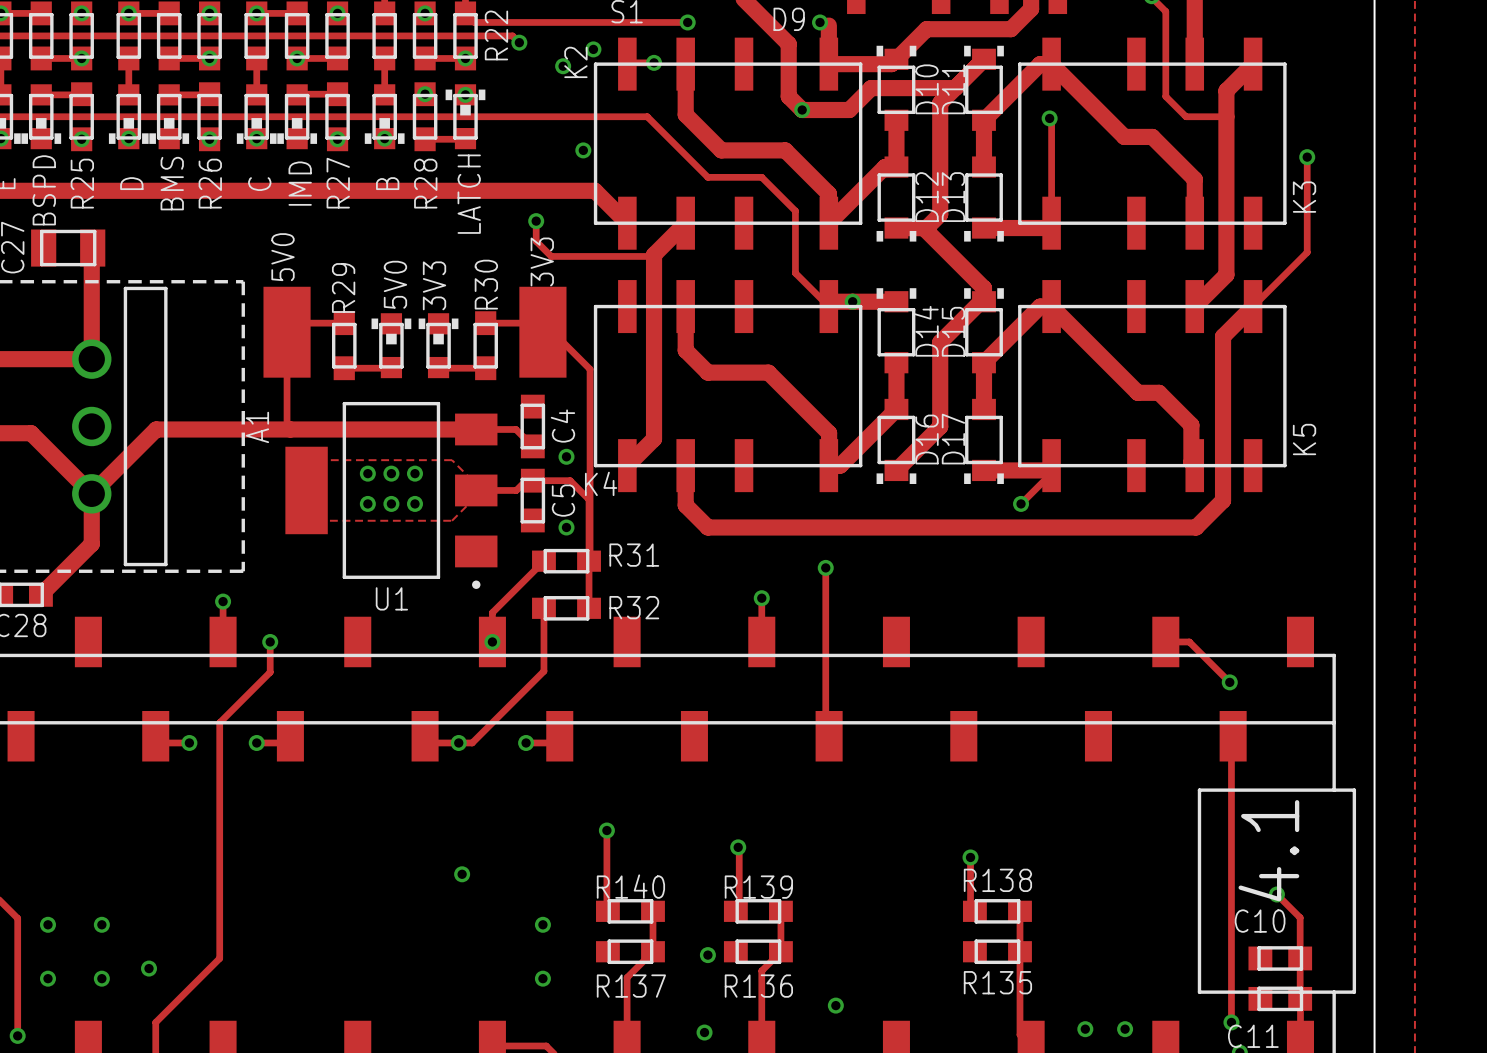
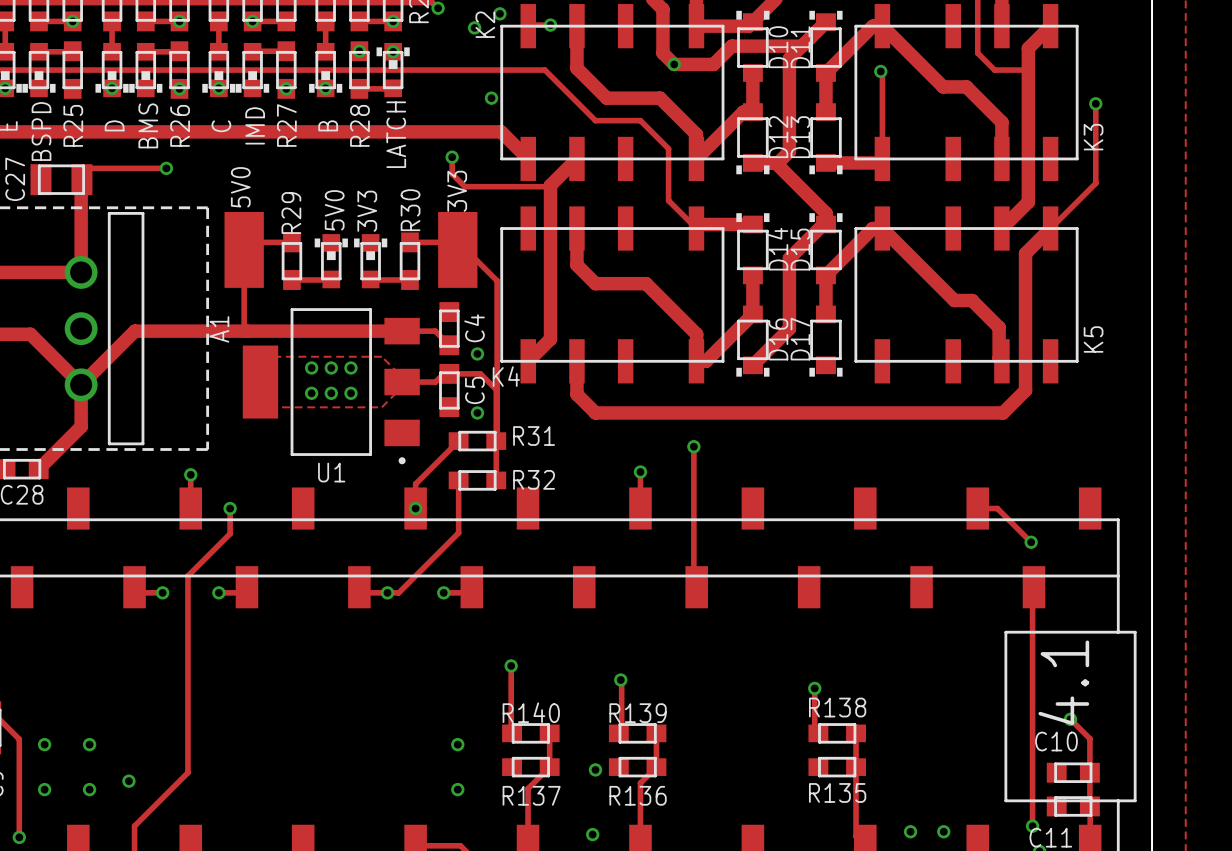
via position: (81, 139) -> (166, 168)
track: none -> (166, 168) (81, 168) (81, 179)
via: (852, 301) -> none
track: (983, 470) (1046, 470) (1051, 465) (1051, 473) (1021, 503) -> none
via: (1021, 503) -> none
via: (462, 874) -> none
via: (835, 1005) -> none

